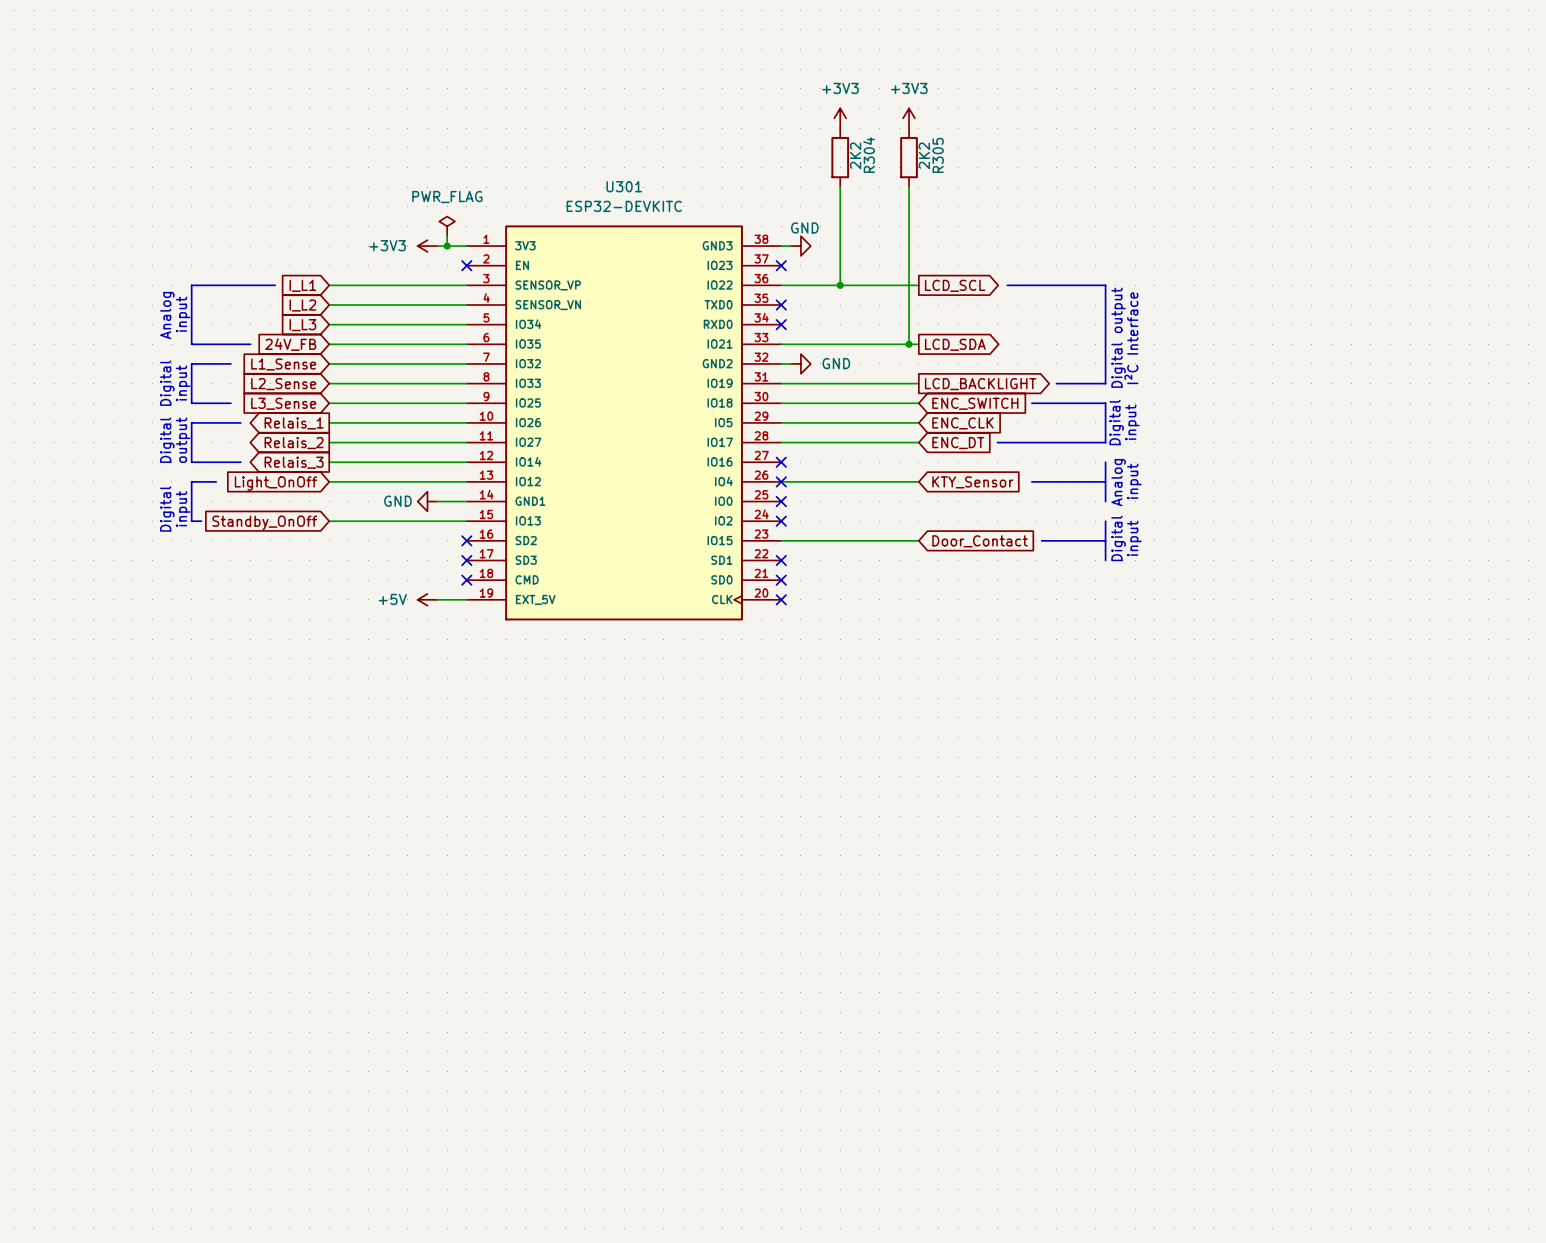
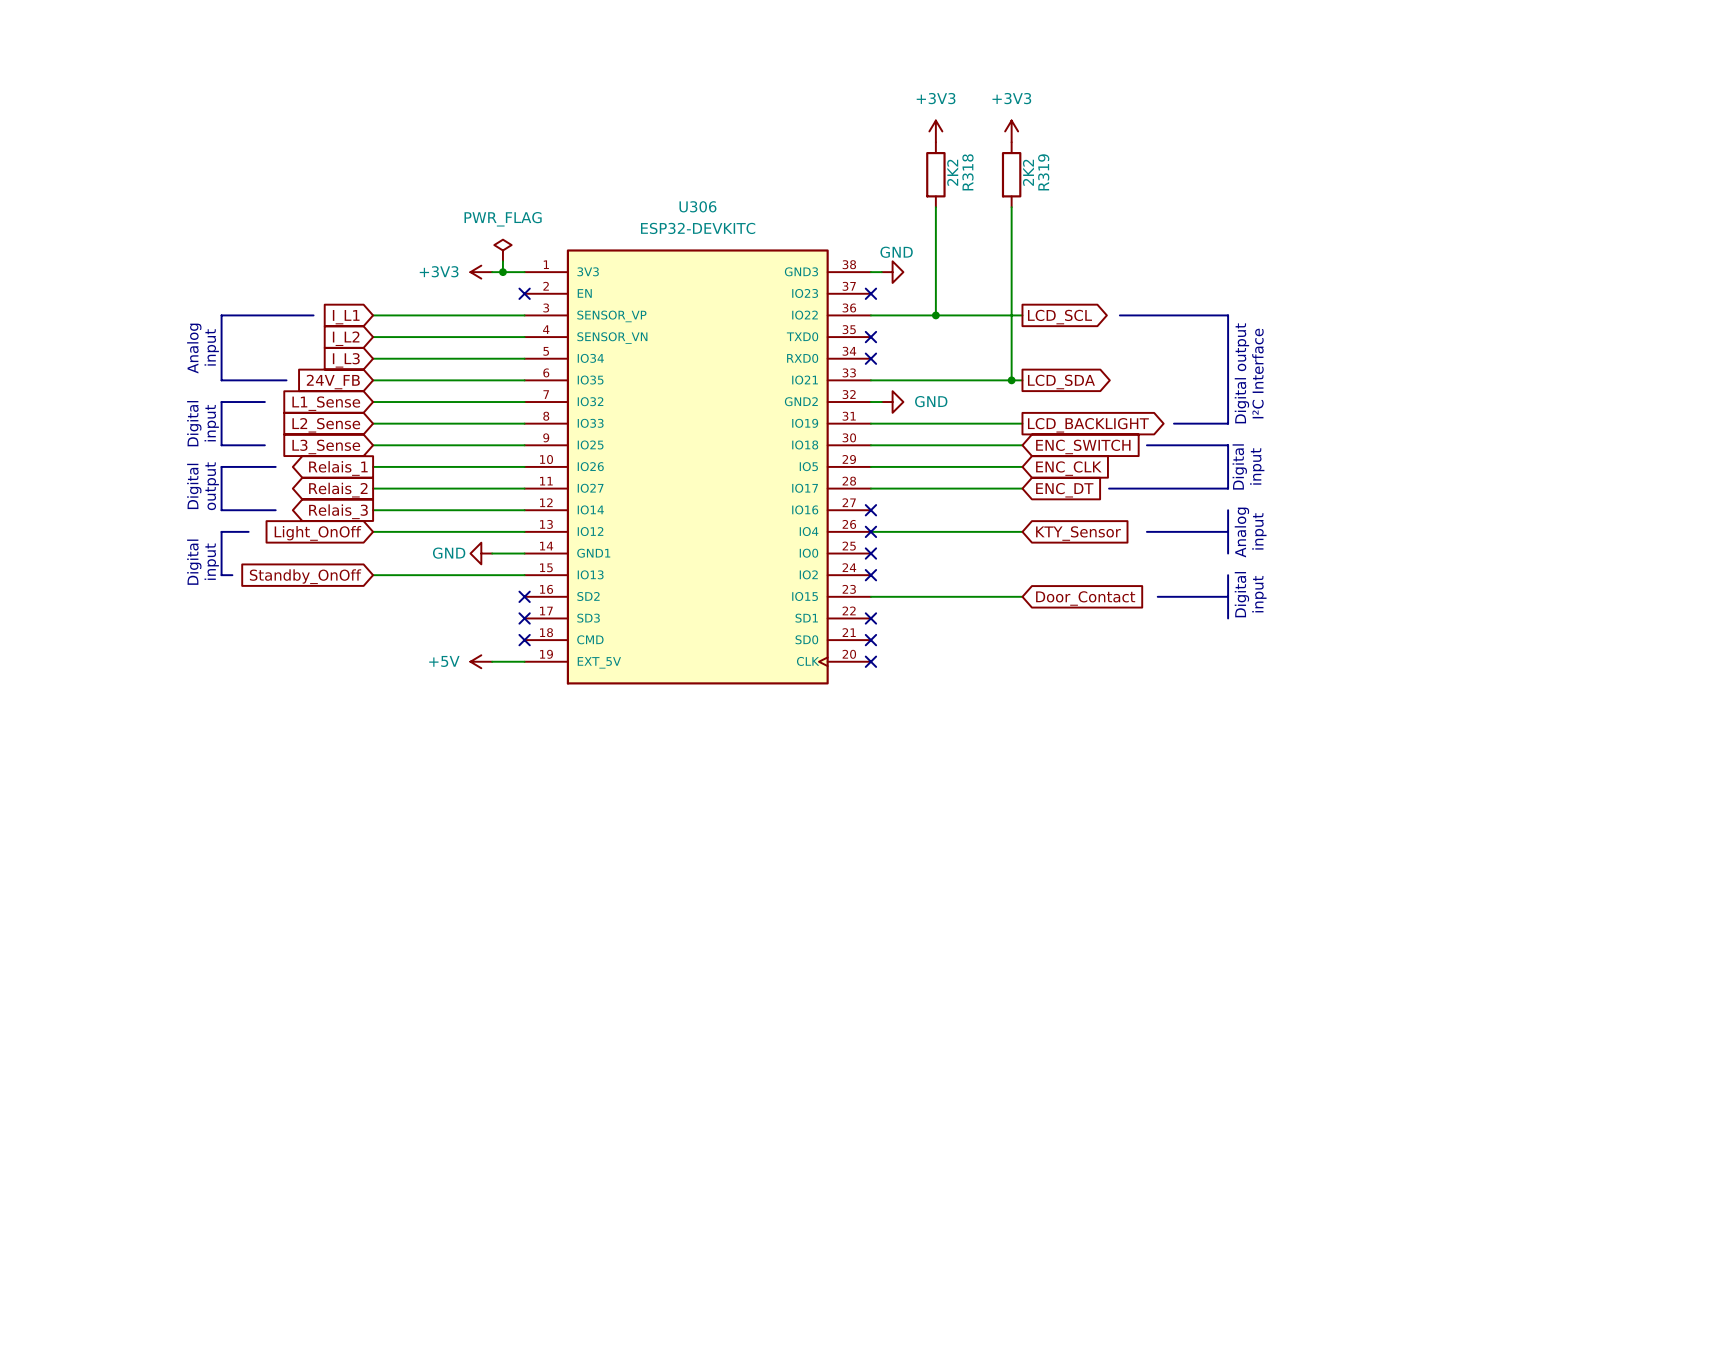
R304 name: R304 (869, 155) -> R318 (967, 172)
R305 name: R305 (938, 155) -> R319 (1043, 172)
U301 name: U301 (624, 186) -> U306 (697, 206)

